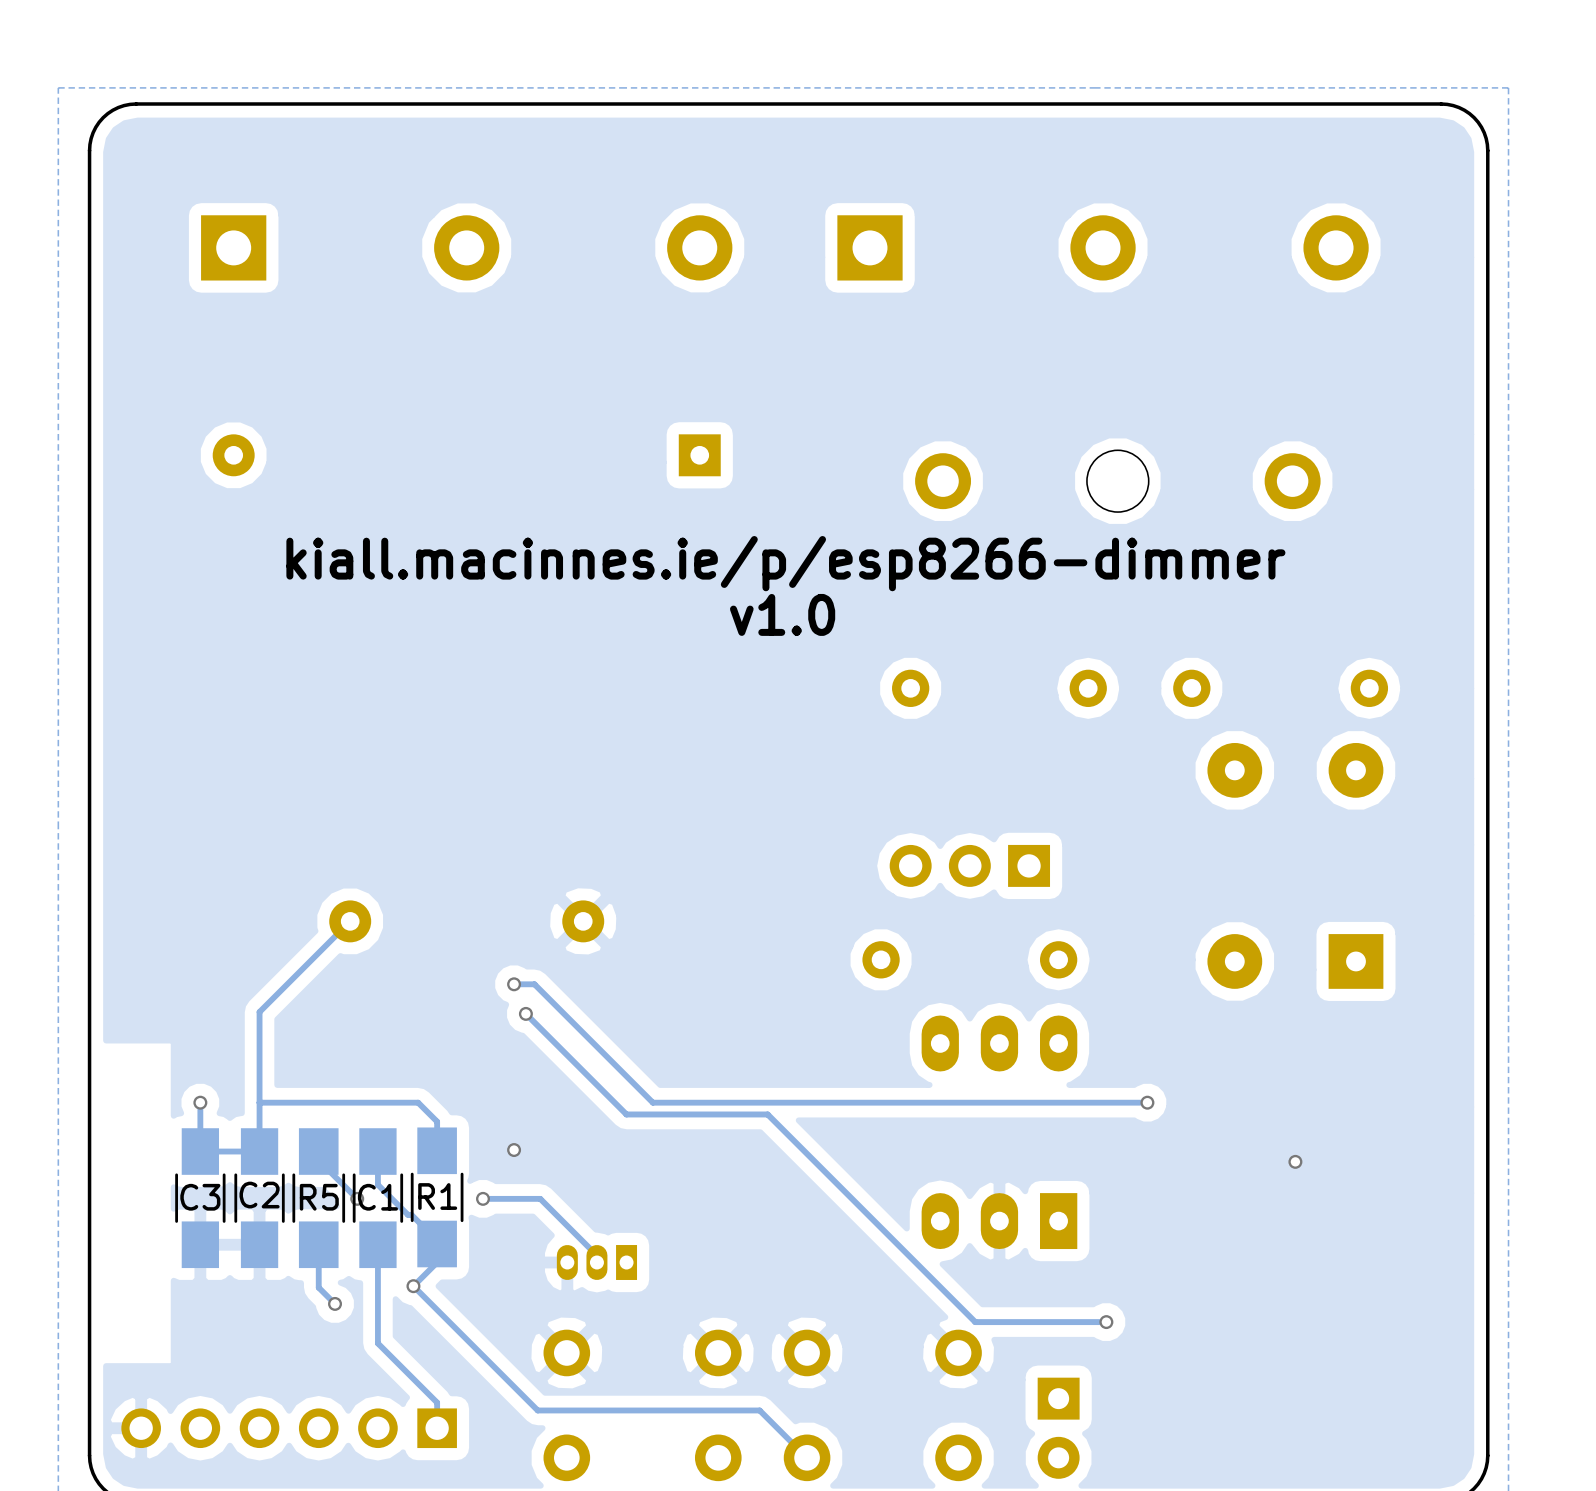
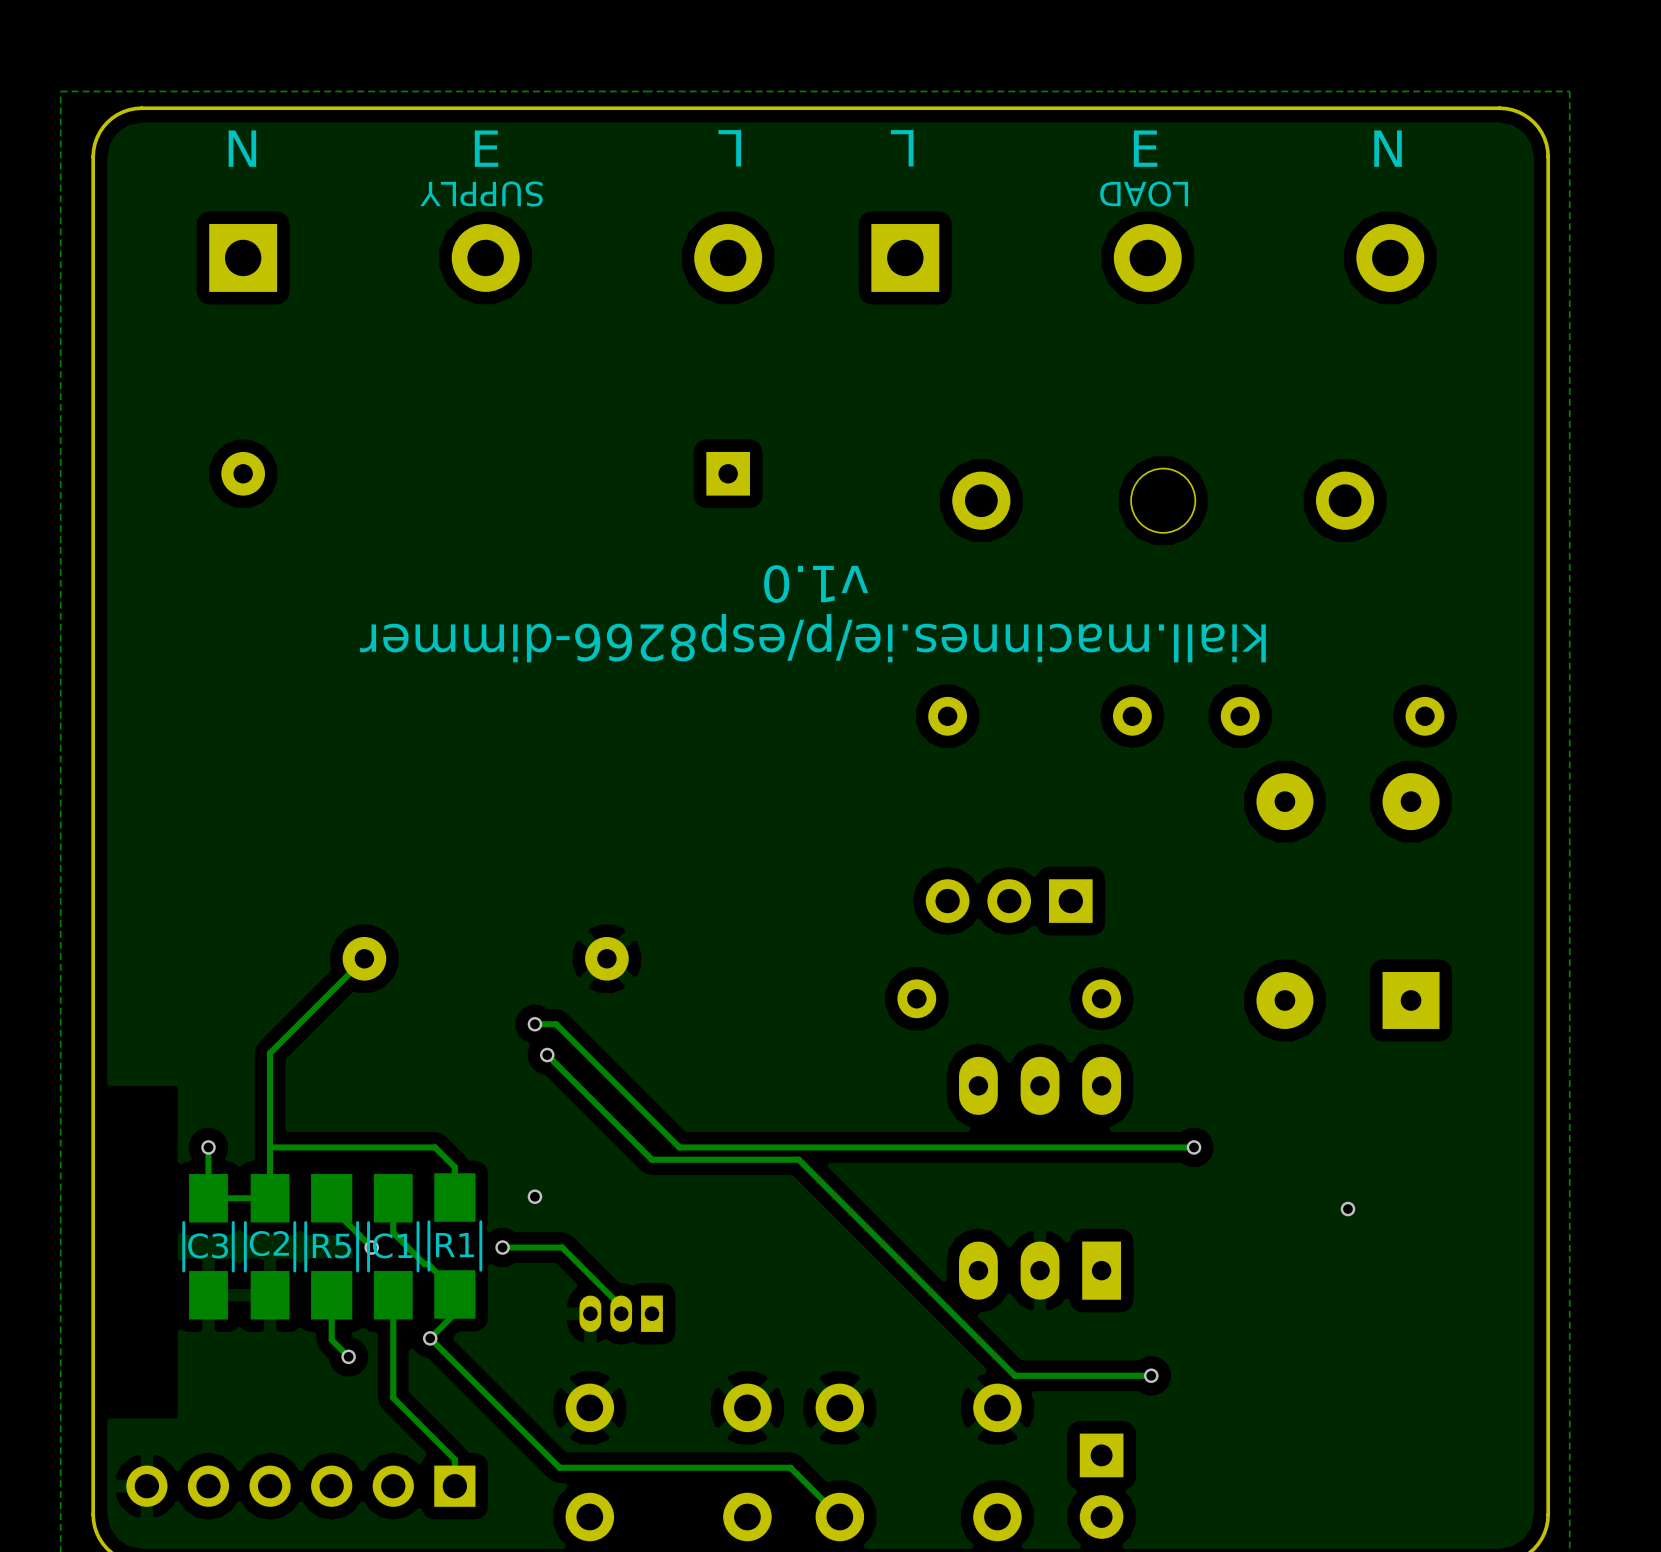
text: none -> N (242, 148)
text: none -> E (486, 148)
text: none -> L (729, 148)
text: none -> L (902, 148)
text: none -> E (1145, 148)
text: none -> N (1388, 148)
text: none -> SUPPLY (481, 194)
text: none -> LOAD (1144, 194)
text: kiall.macinnes.ie/p/esp8266-dimmer (785, 563) -> v1.0 (816, 584)
text: v1.0 (782, 614) -> kiall.macinnes.ie/p/esp8266-dimmer (812, 638)

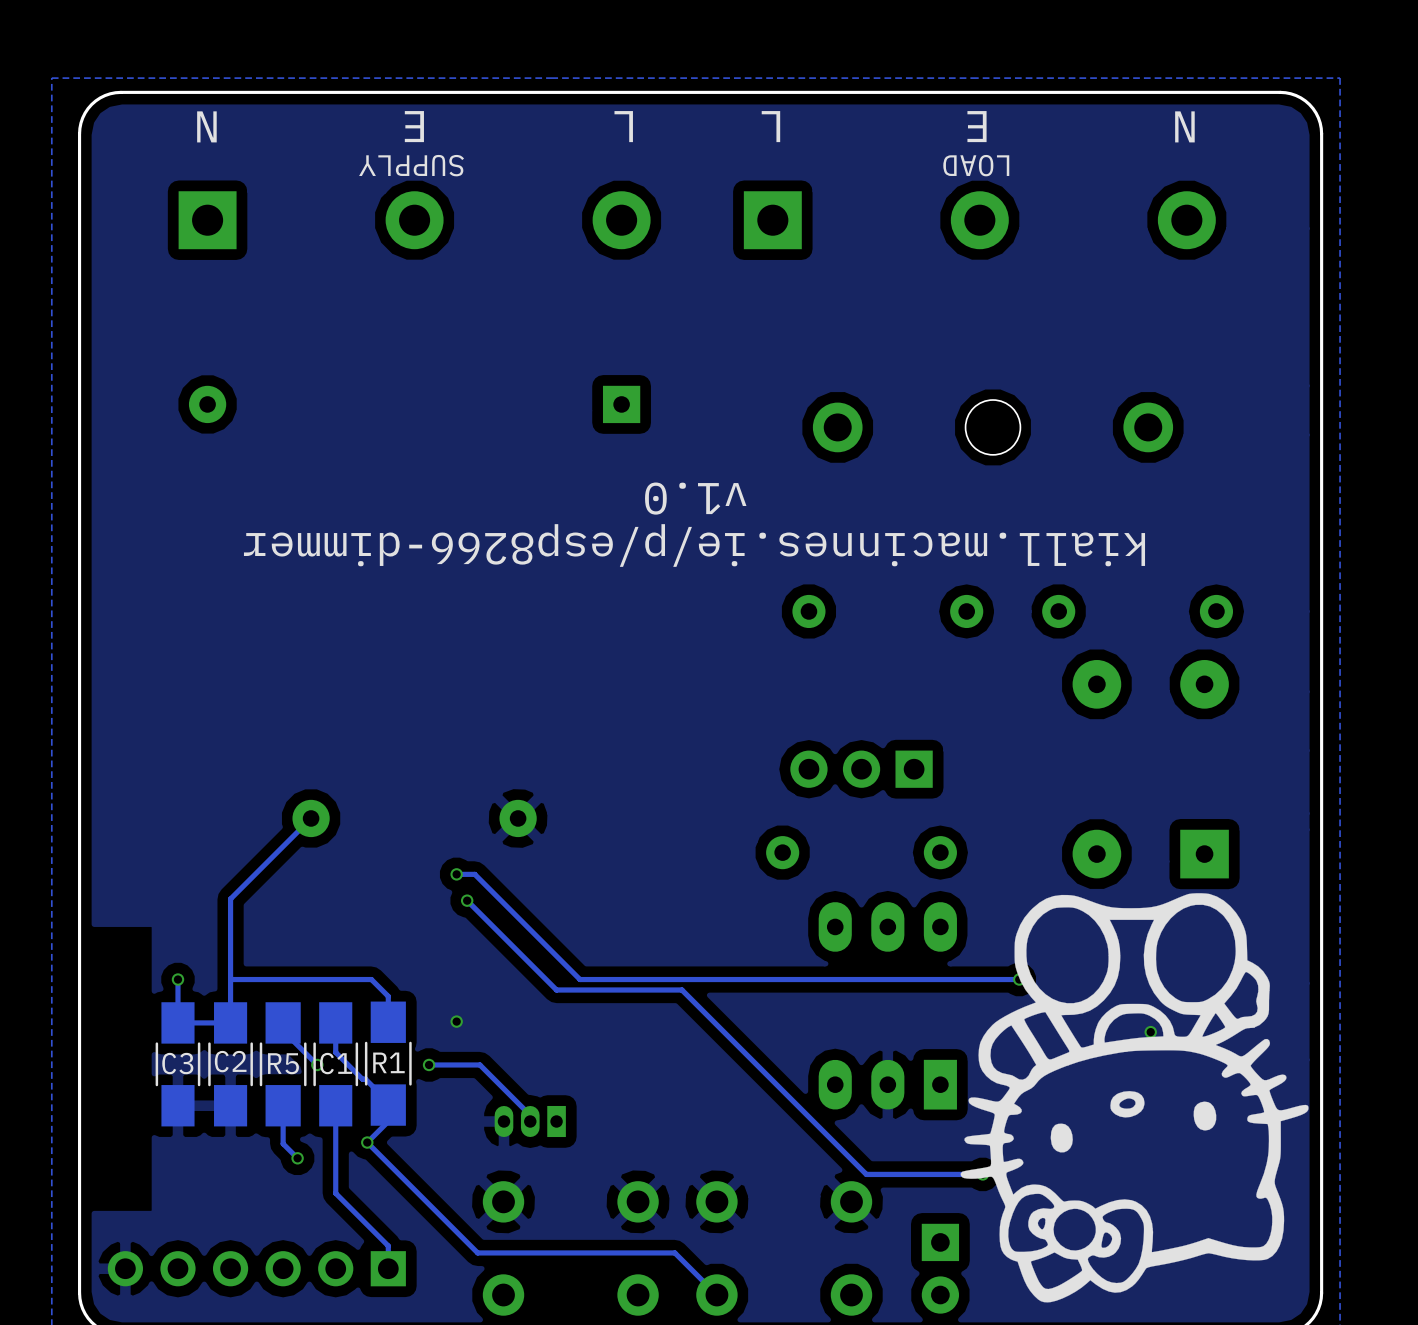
text rotation: 0° (486, 148) -> 180° (414, 126)
text rotation: 0° (1145, 148) -> 180° (977, 126)
drawing: none -> [960, 893, 1309, 1303]

